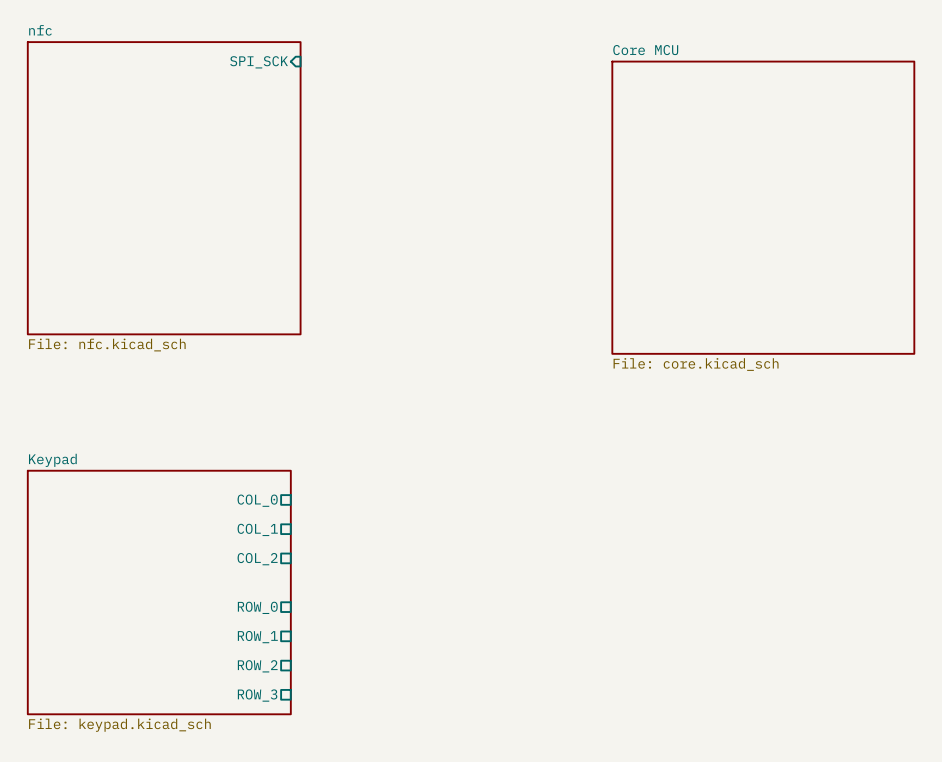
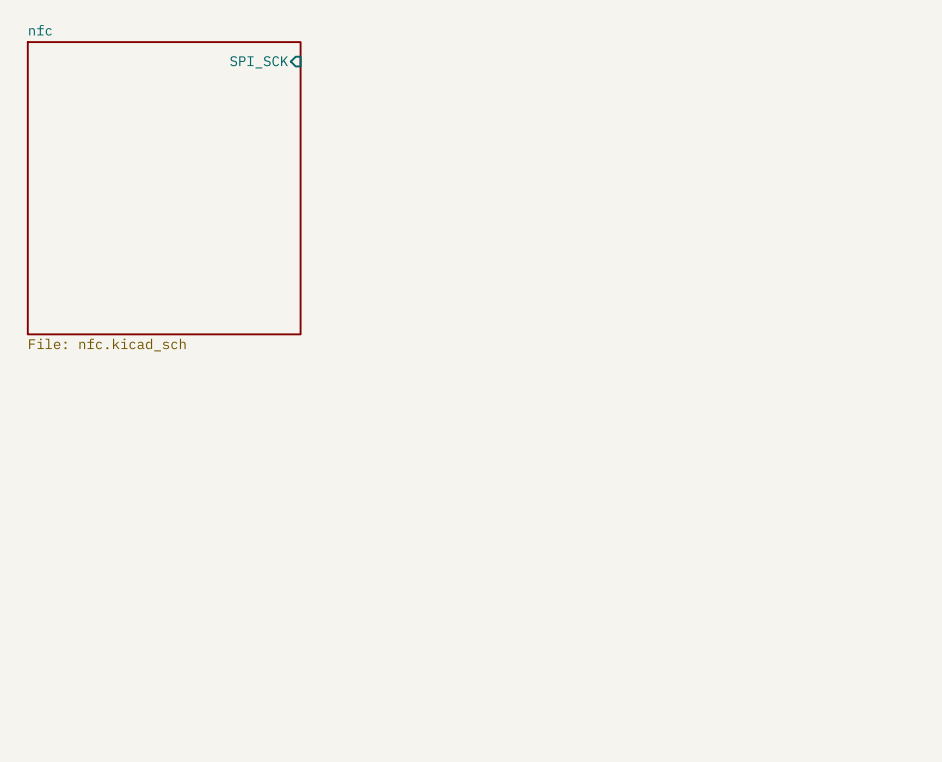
sheet Core MCU: File: core.kicad_sch (763, 207) -> none
sheet pin: COL_0 (257, 500) -> none
sheet pin: COL_1 (257, 529) -> none
sheet pin: COL_2 (257, 559) -> none
sheet Keypad: File: keypad.kicad_sch (159, 592) -> none
sheet pin: ROW_0 (257, 607) -> none
sheet pin: ROW_1 (257, 637) -> none
sheet pin: ROW_2 (257, 666) -> none
sheet pin: ROW_3 (257, 695) -> none

